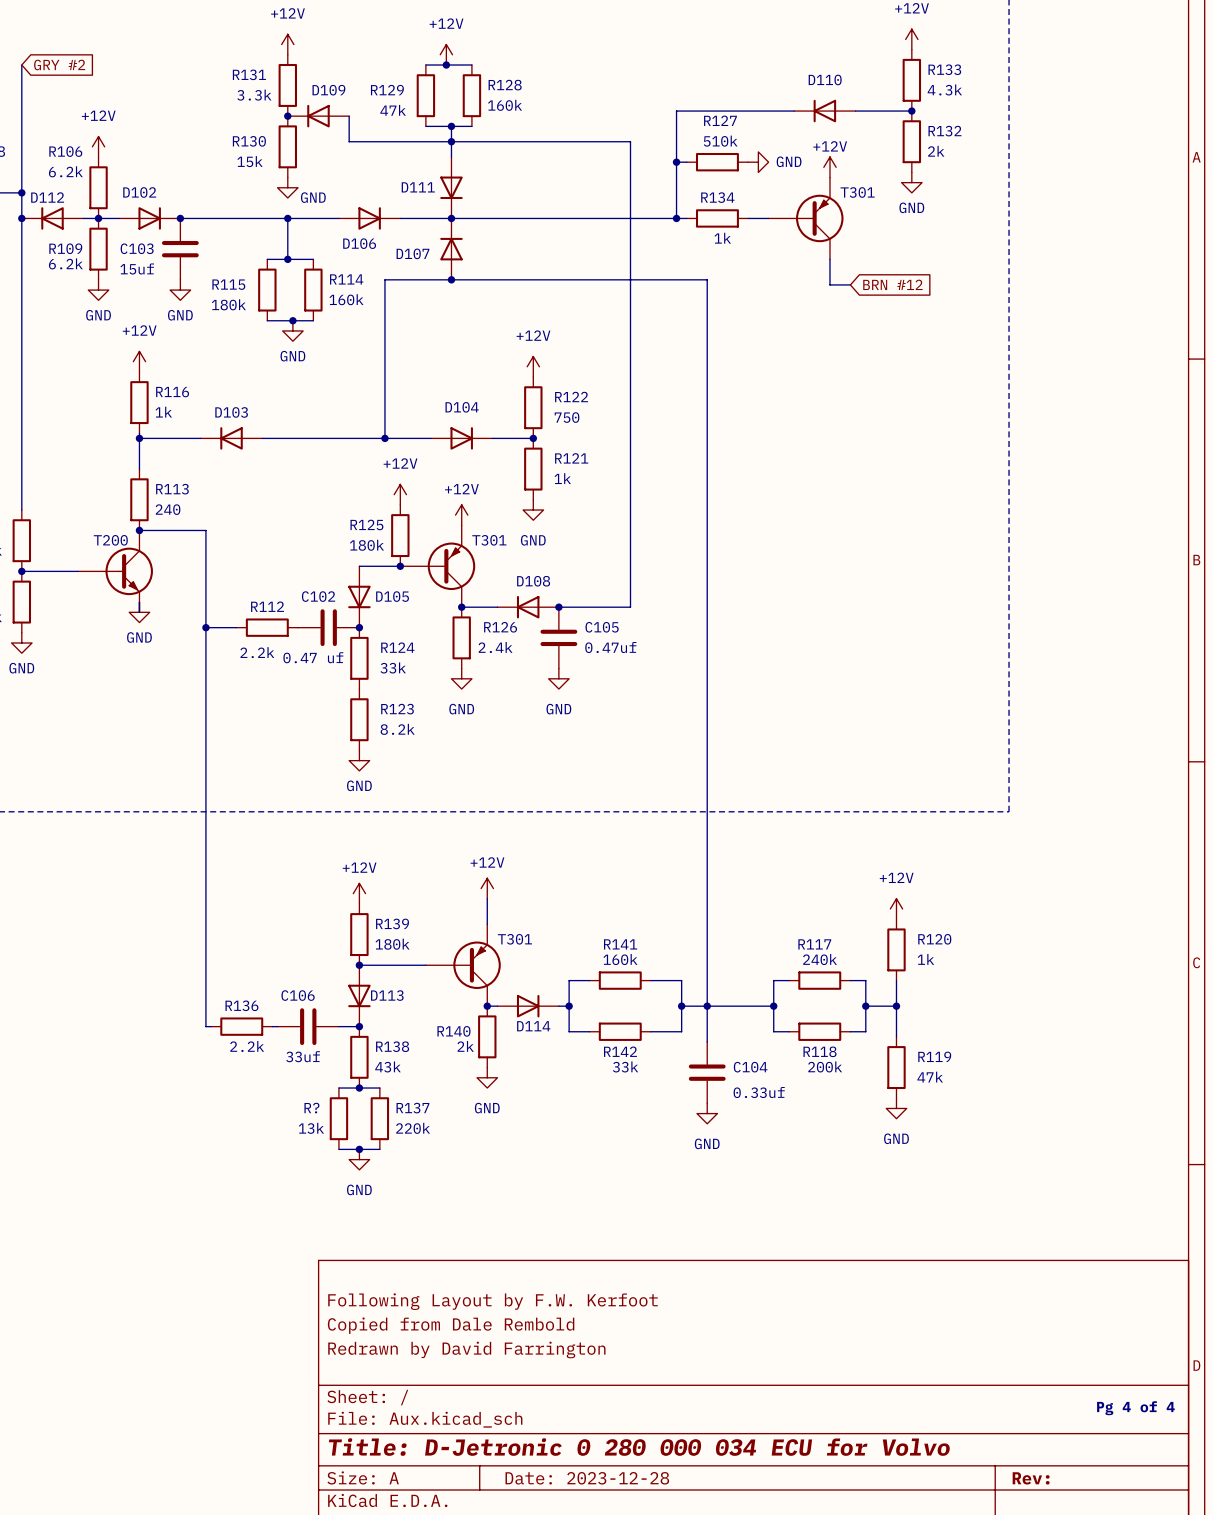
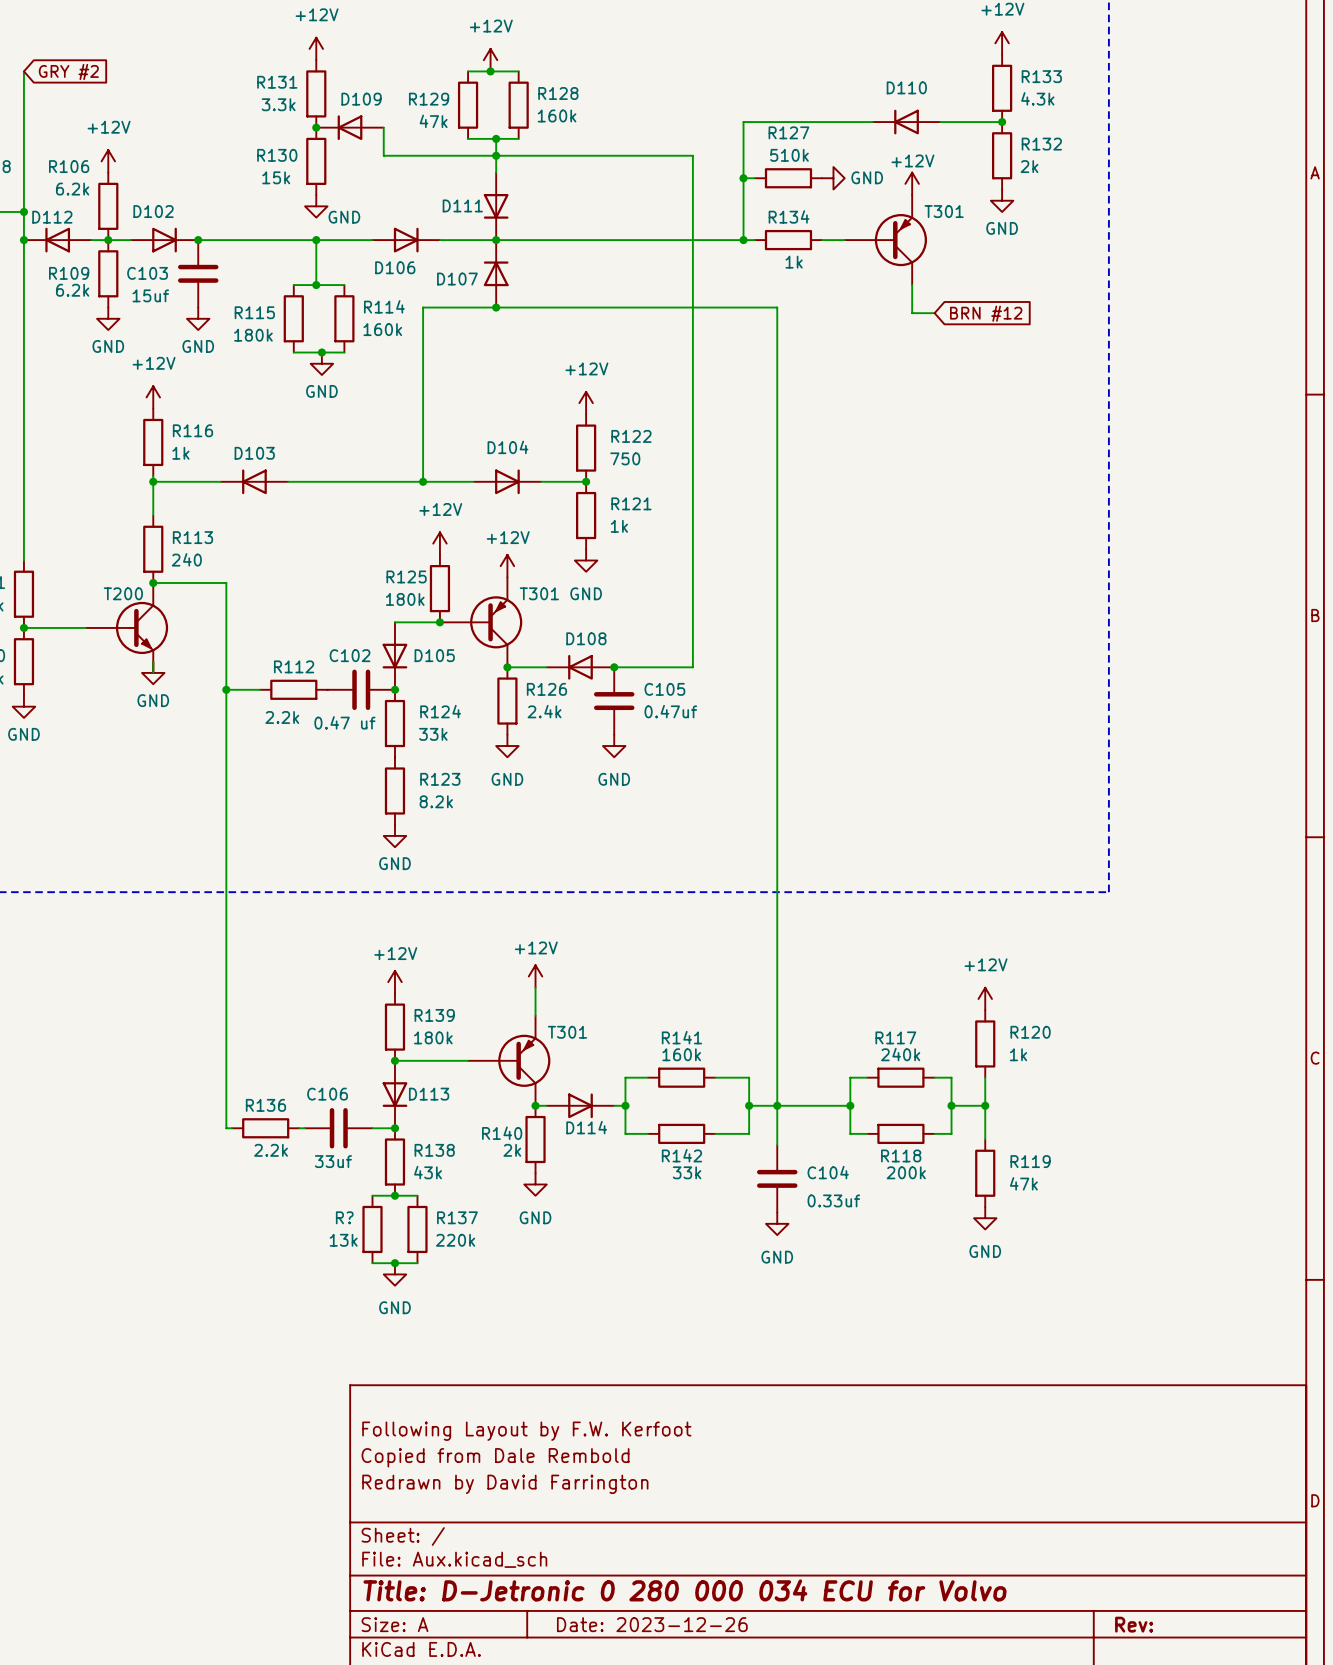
text: Pg 4 of 4 (1135, 1408) -> none
title block: Date: 2023-12-28 (587, 1478) -> Date: 2023-12-26 (652, 1624)

